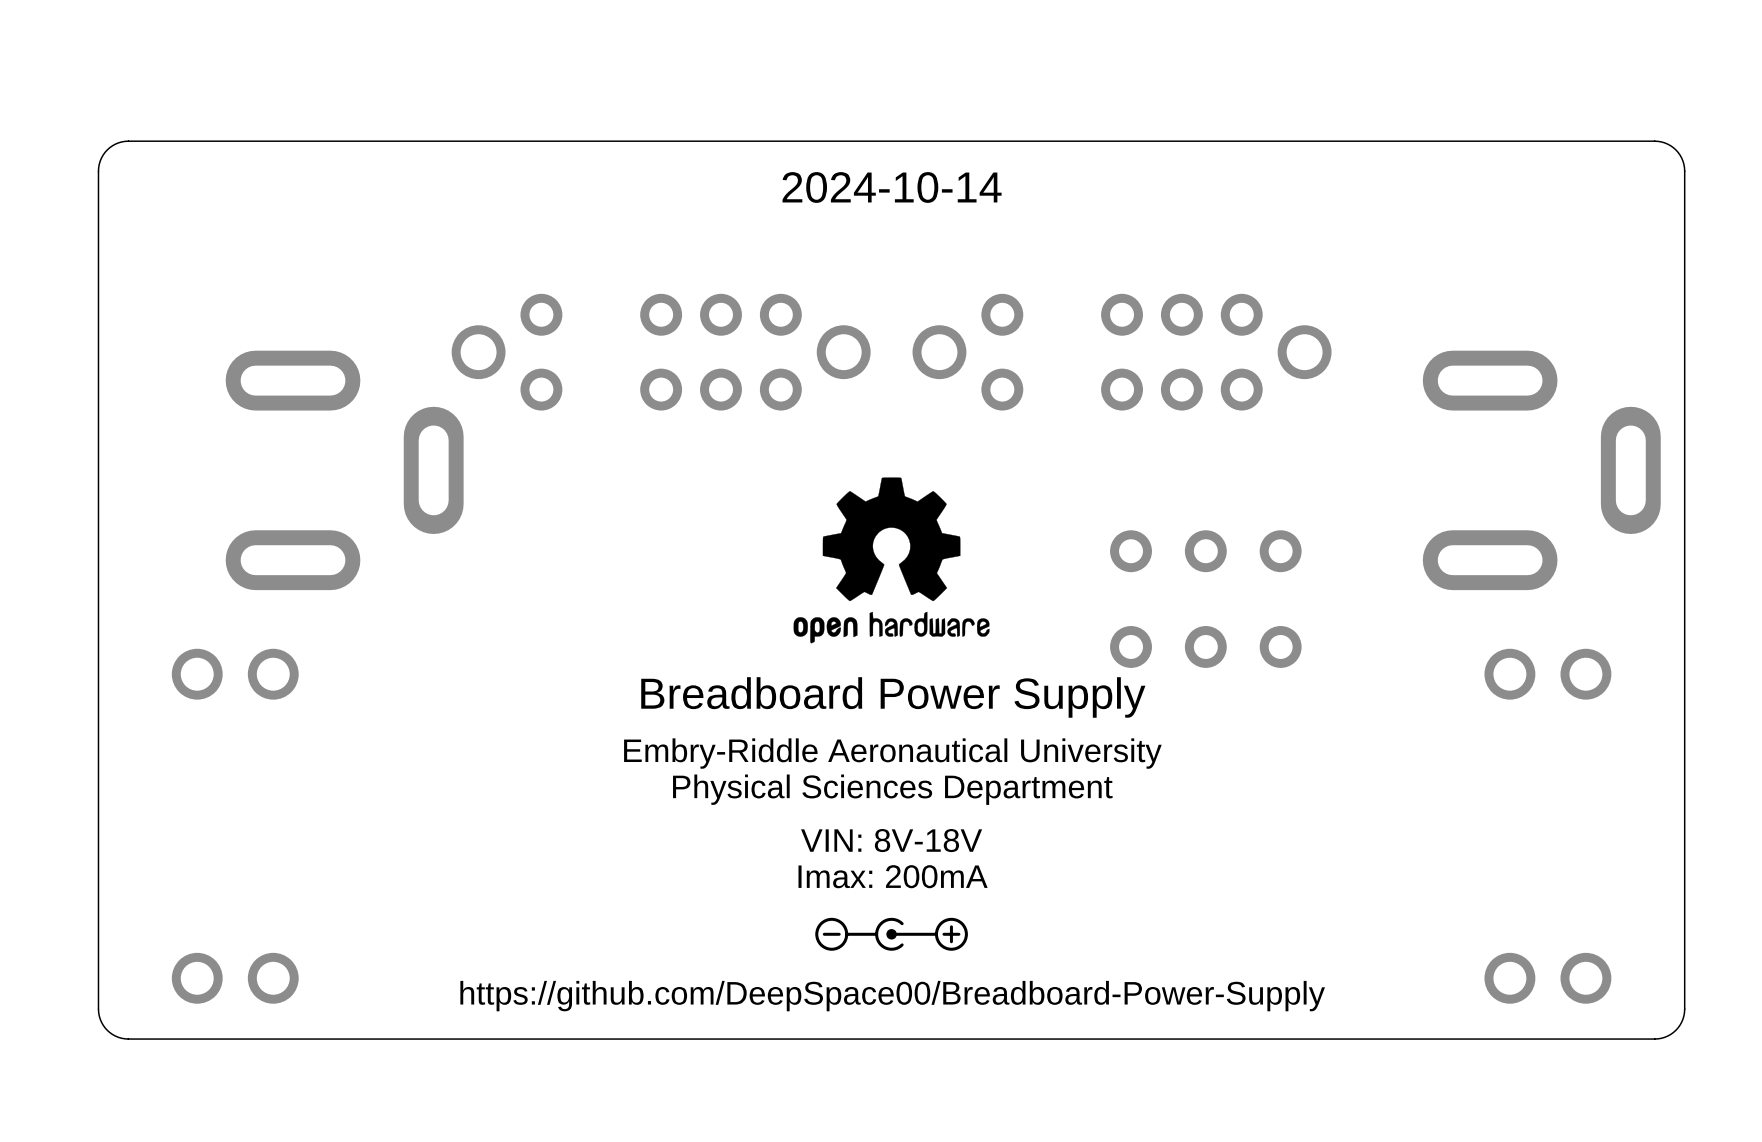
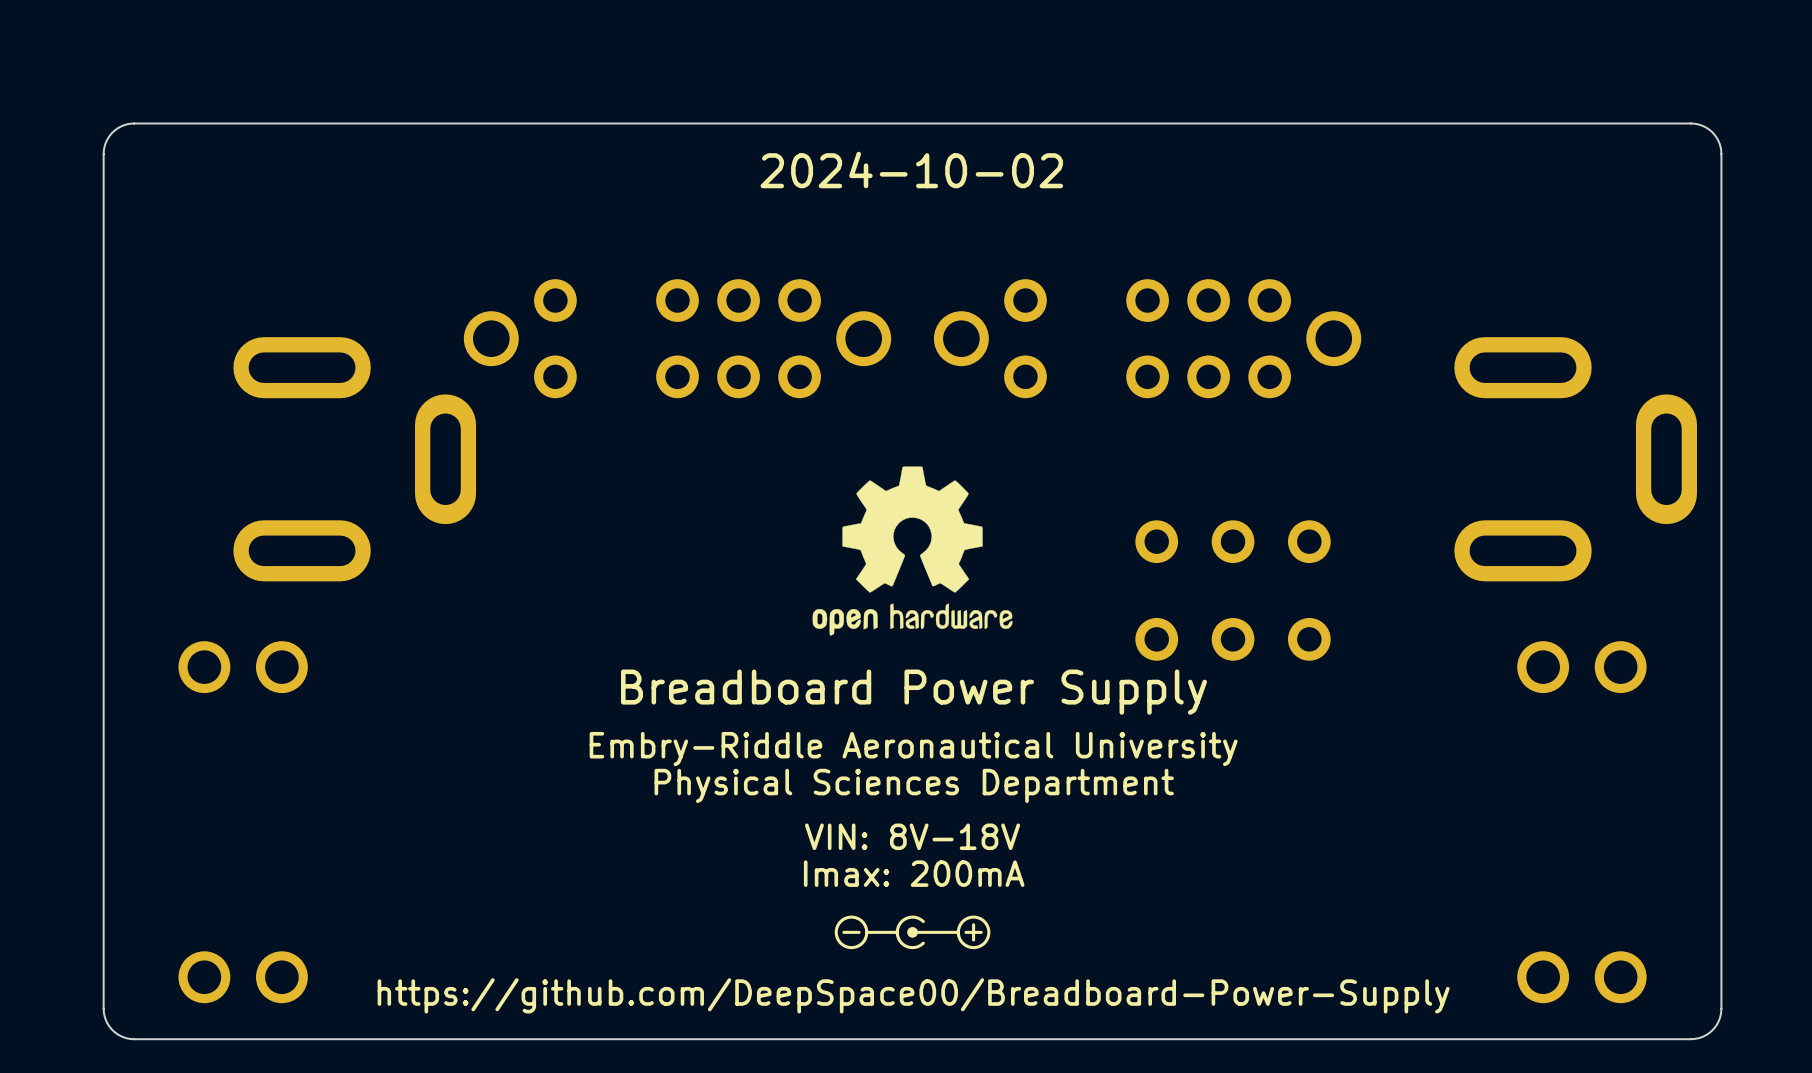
text: 2024-10-14 (892, 187) -> 2024-10-02 (911, 170)

